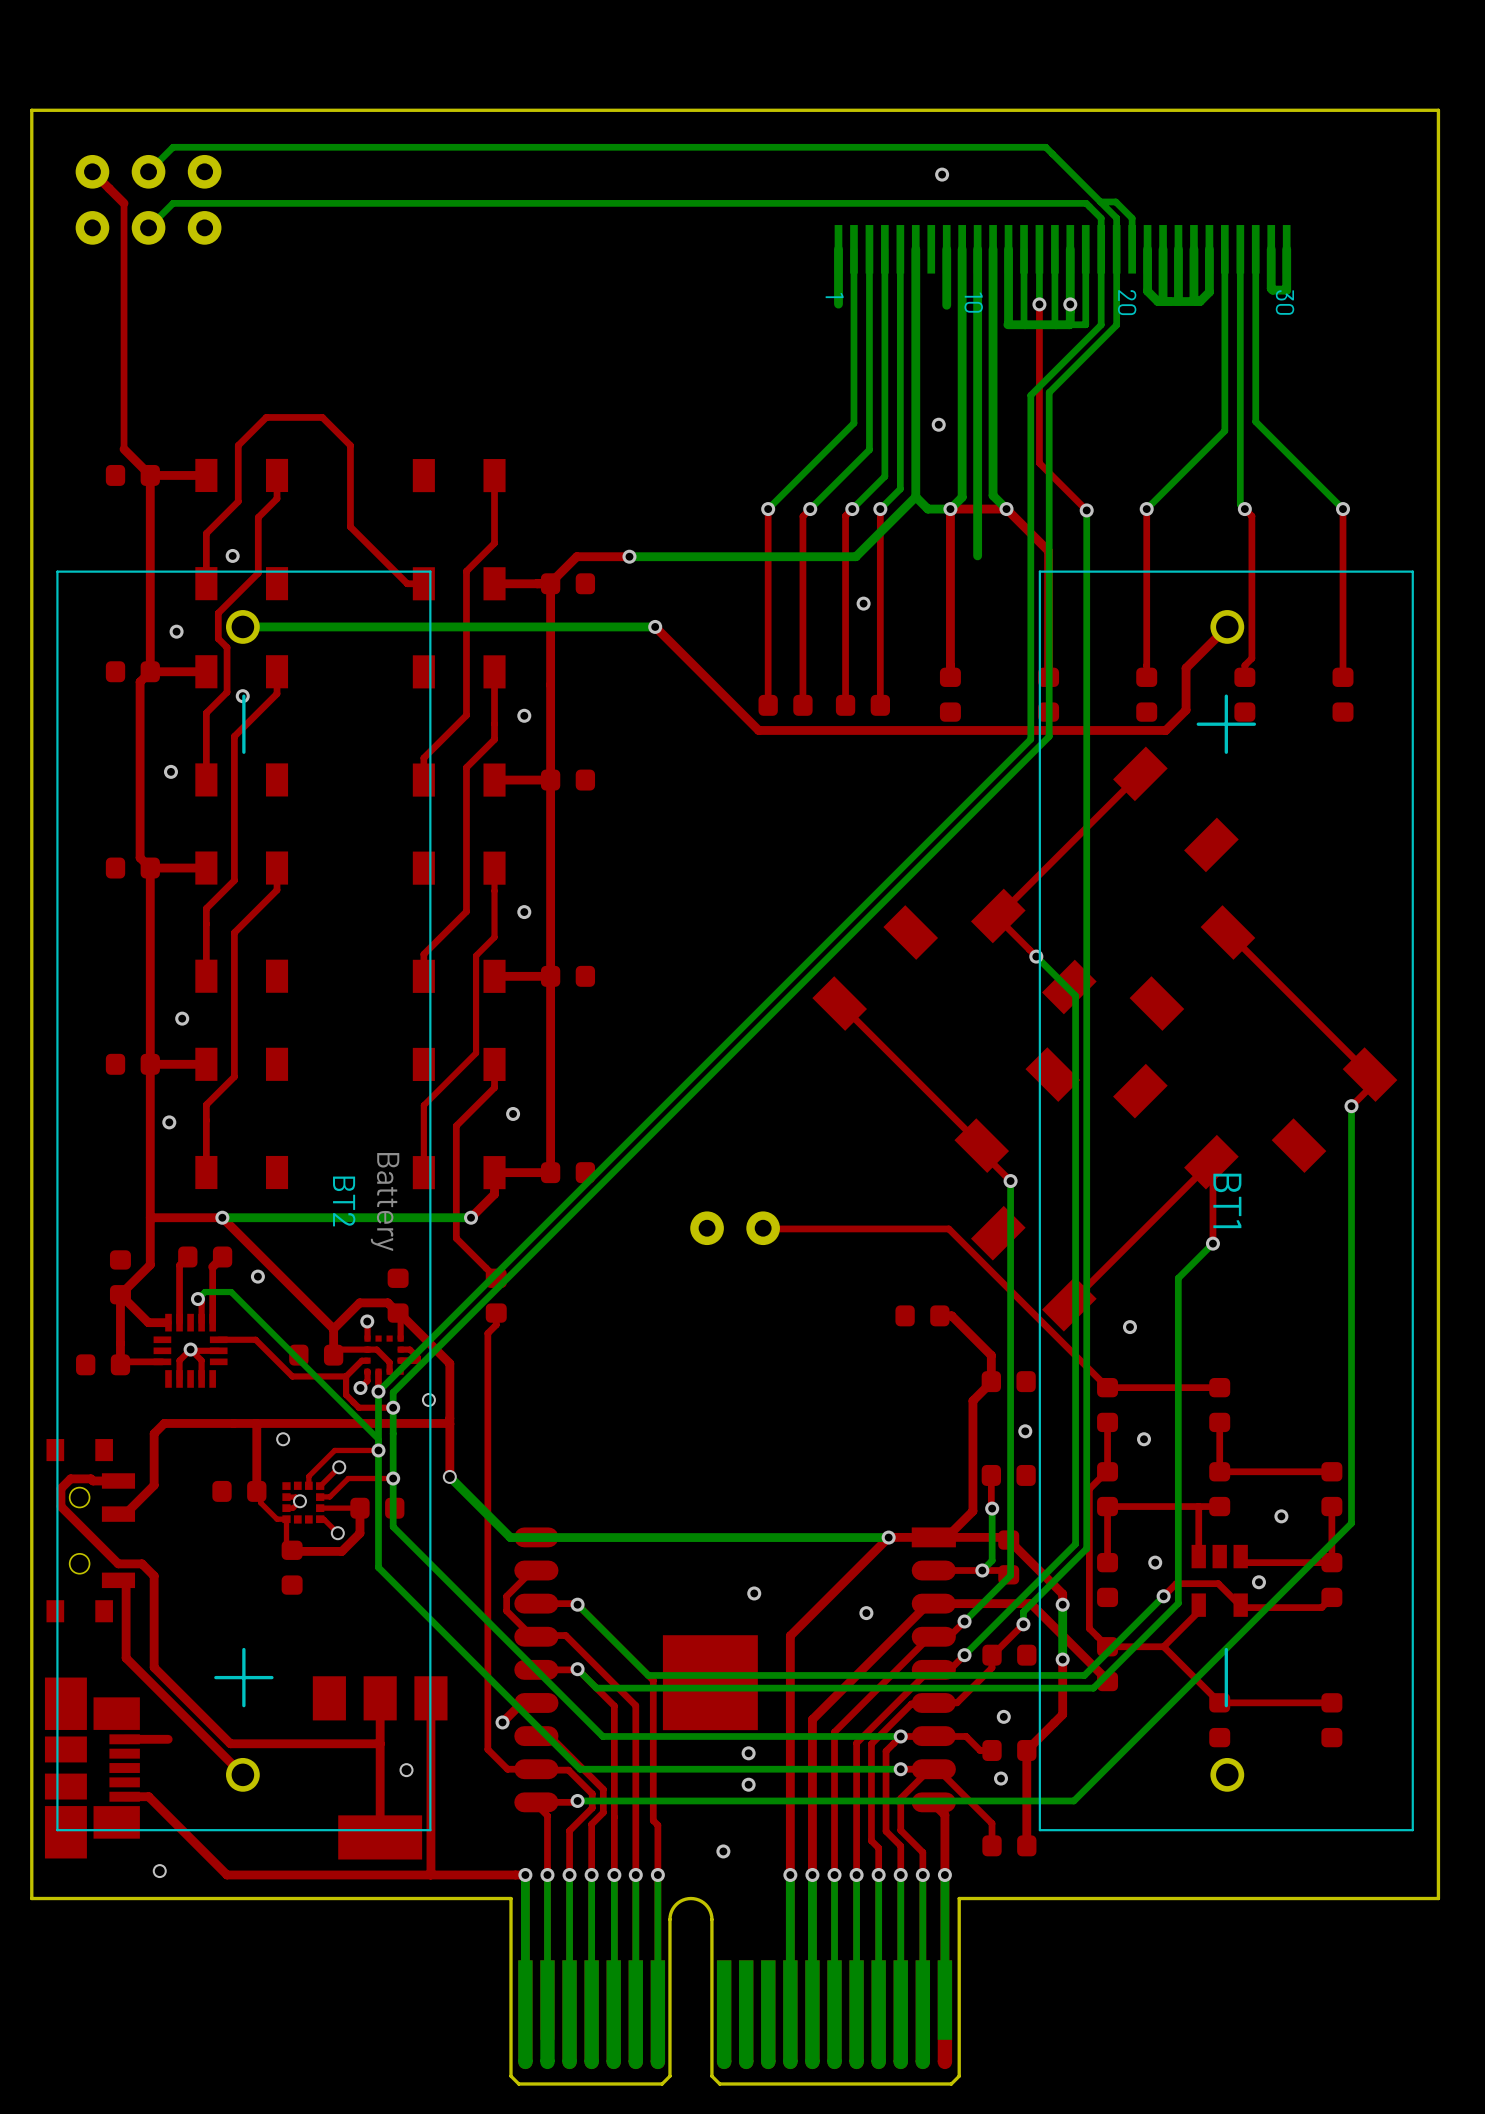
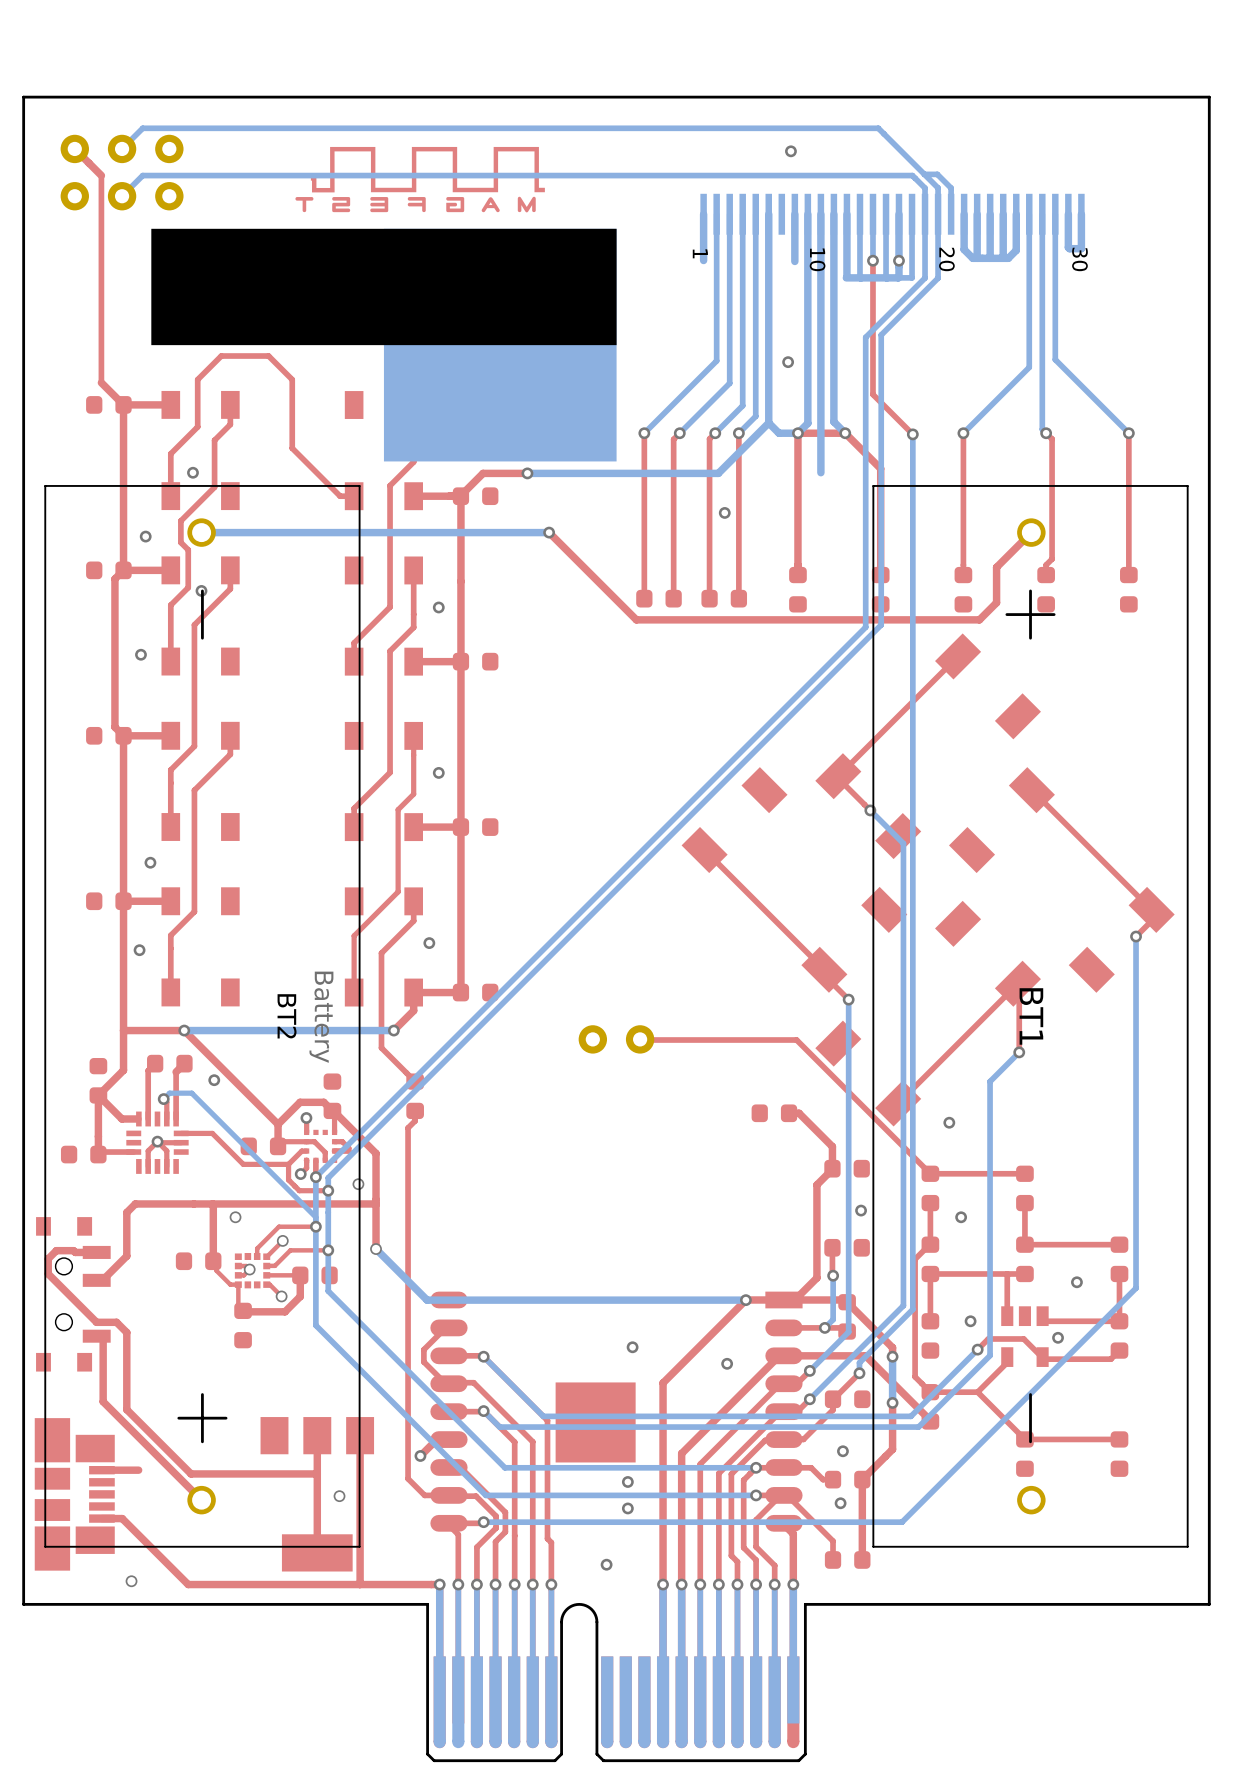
drawing: none -> [151, 146, 617, 462]

